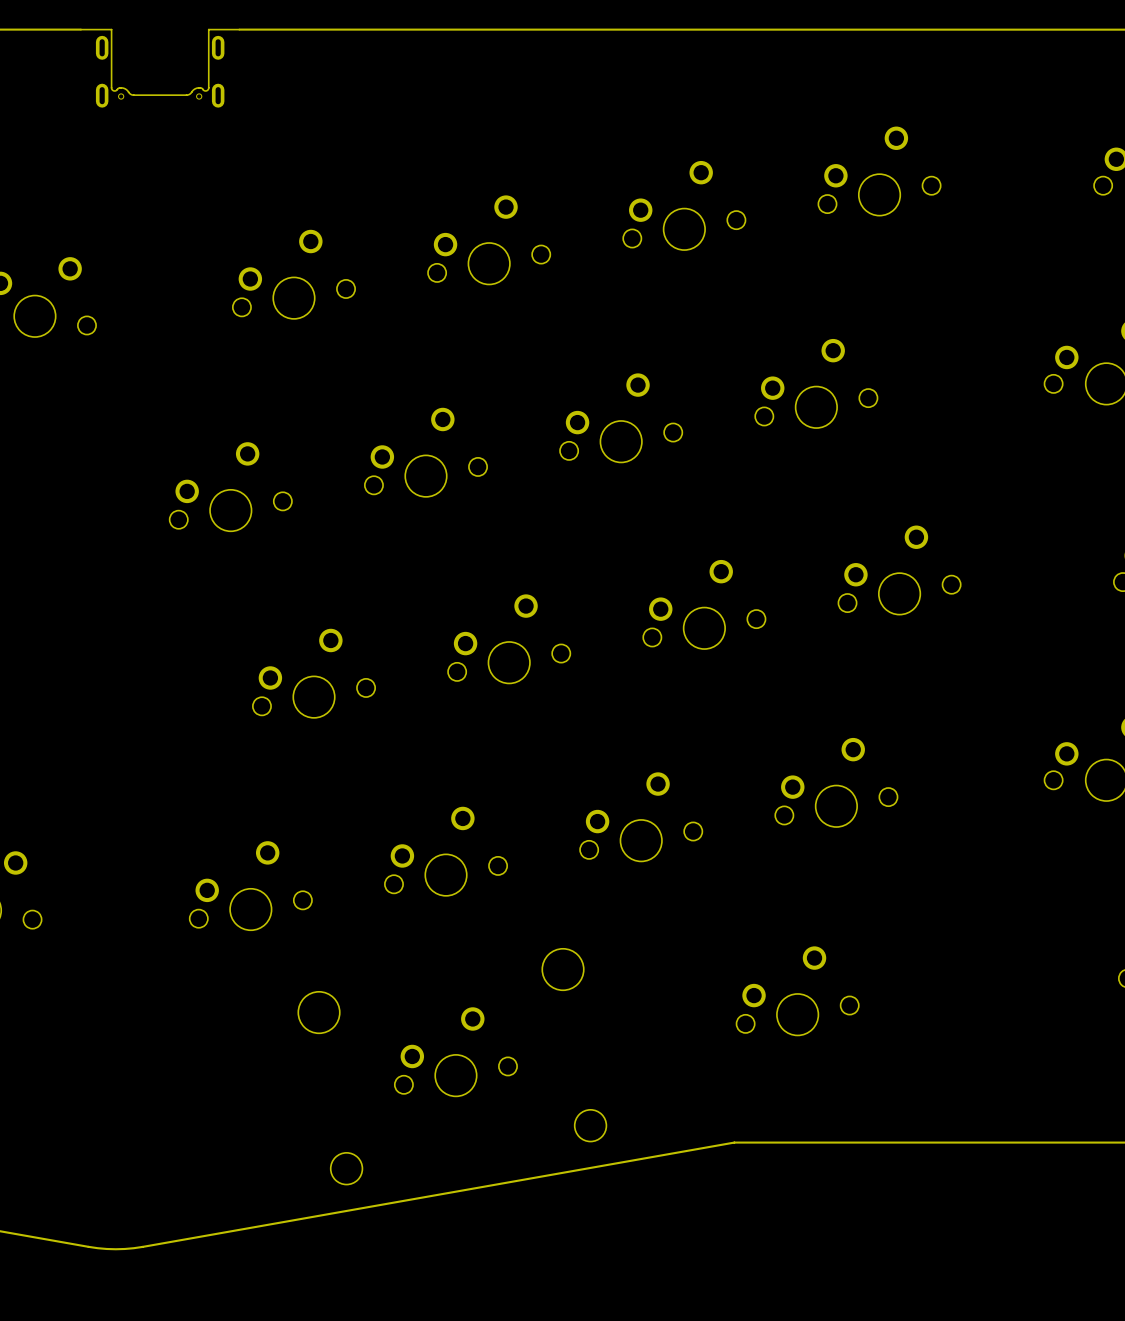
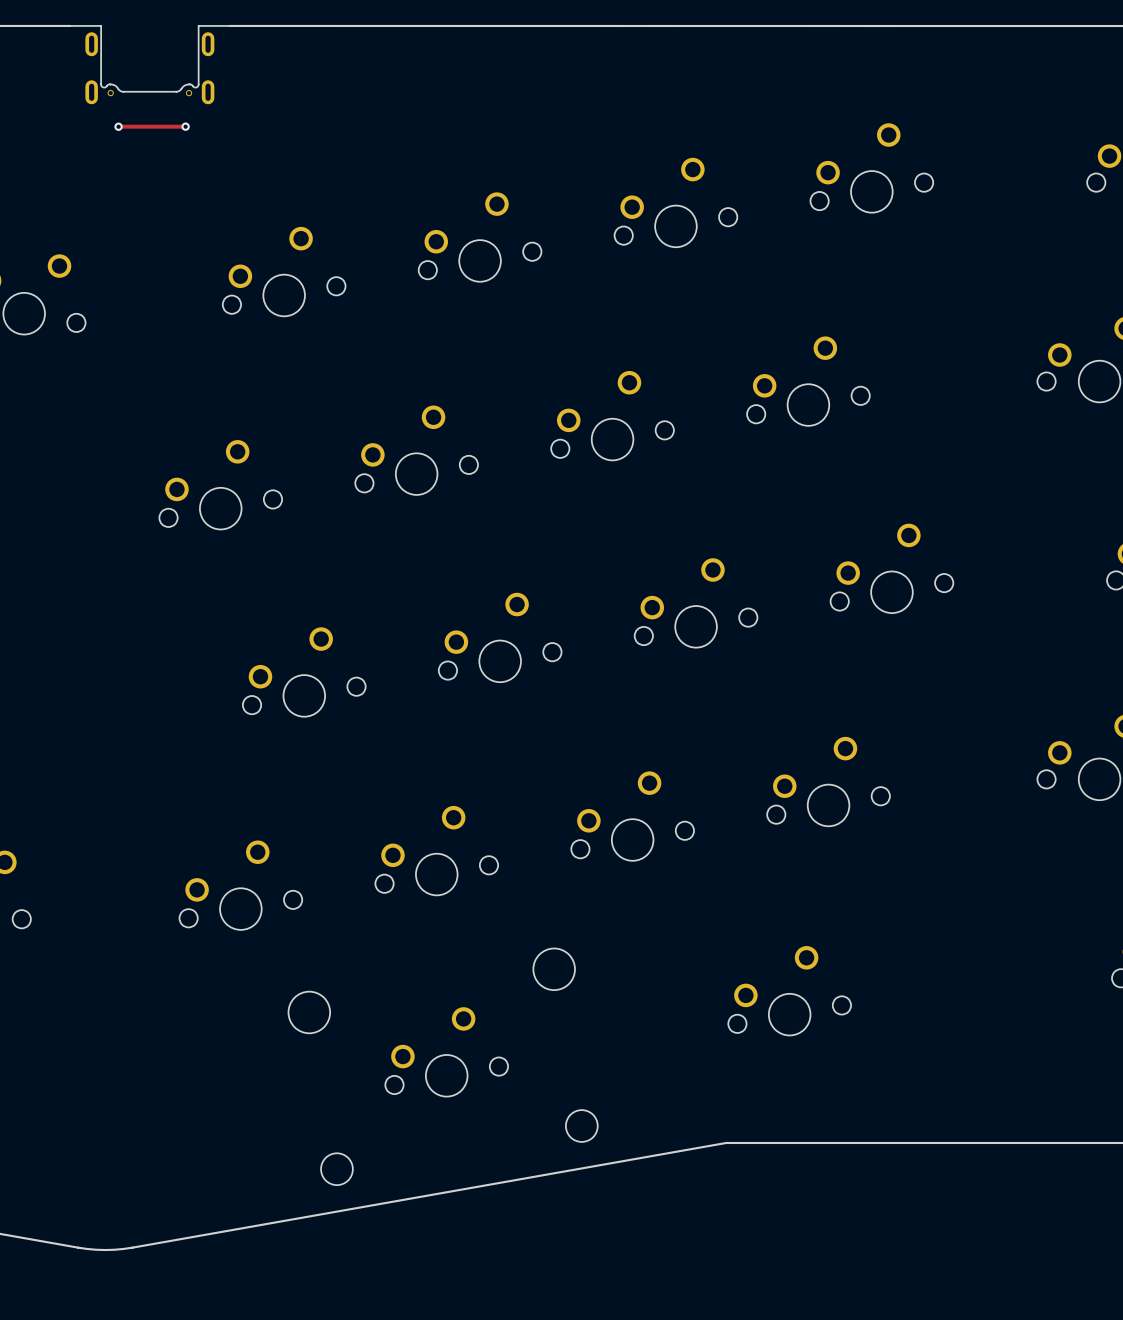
track: none -> (185, 126) (117, 127)
via: none -> (185, 126)
via: none -> (118, 126)

